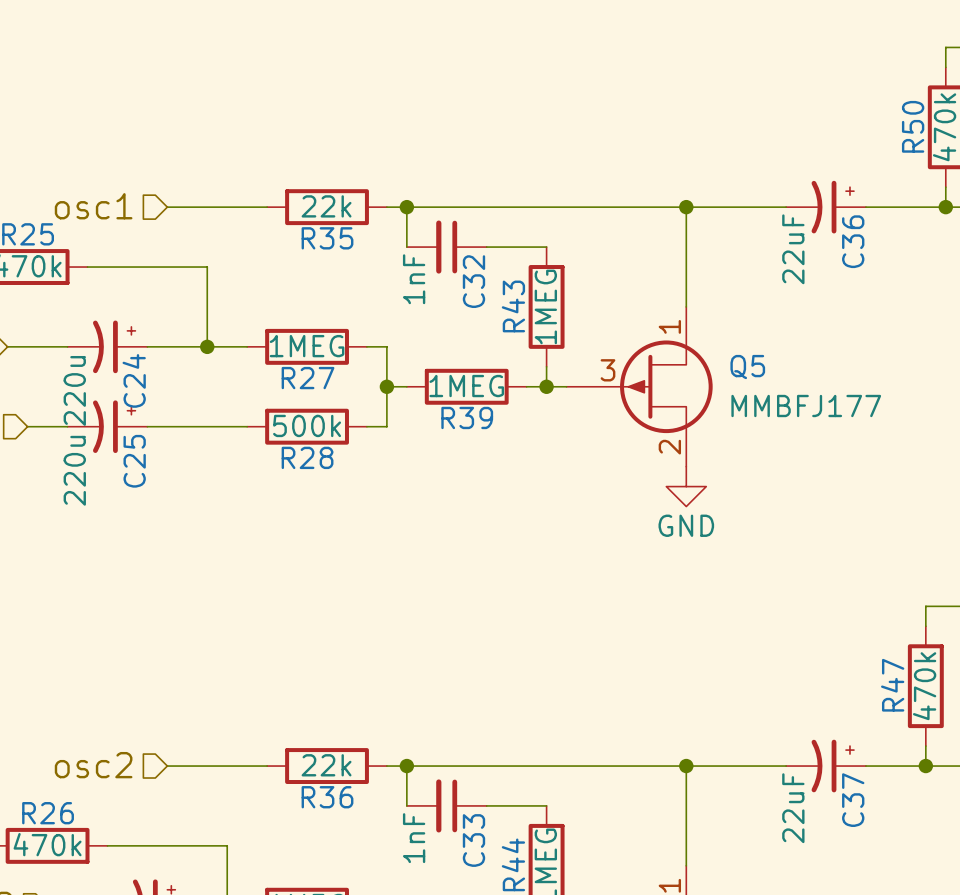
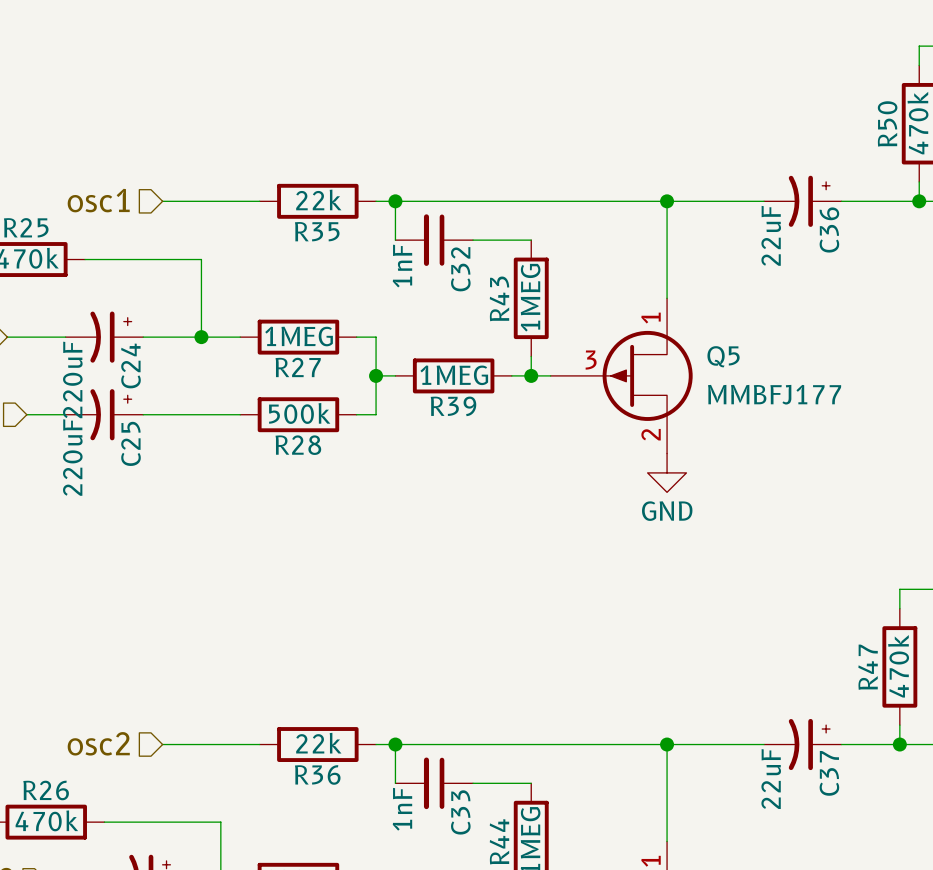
C24 value: 220u (74, 390) -> 220uF (72, 379)
C25 value: 220u (74, 470) -> 220uF (72, 457)

